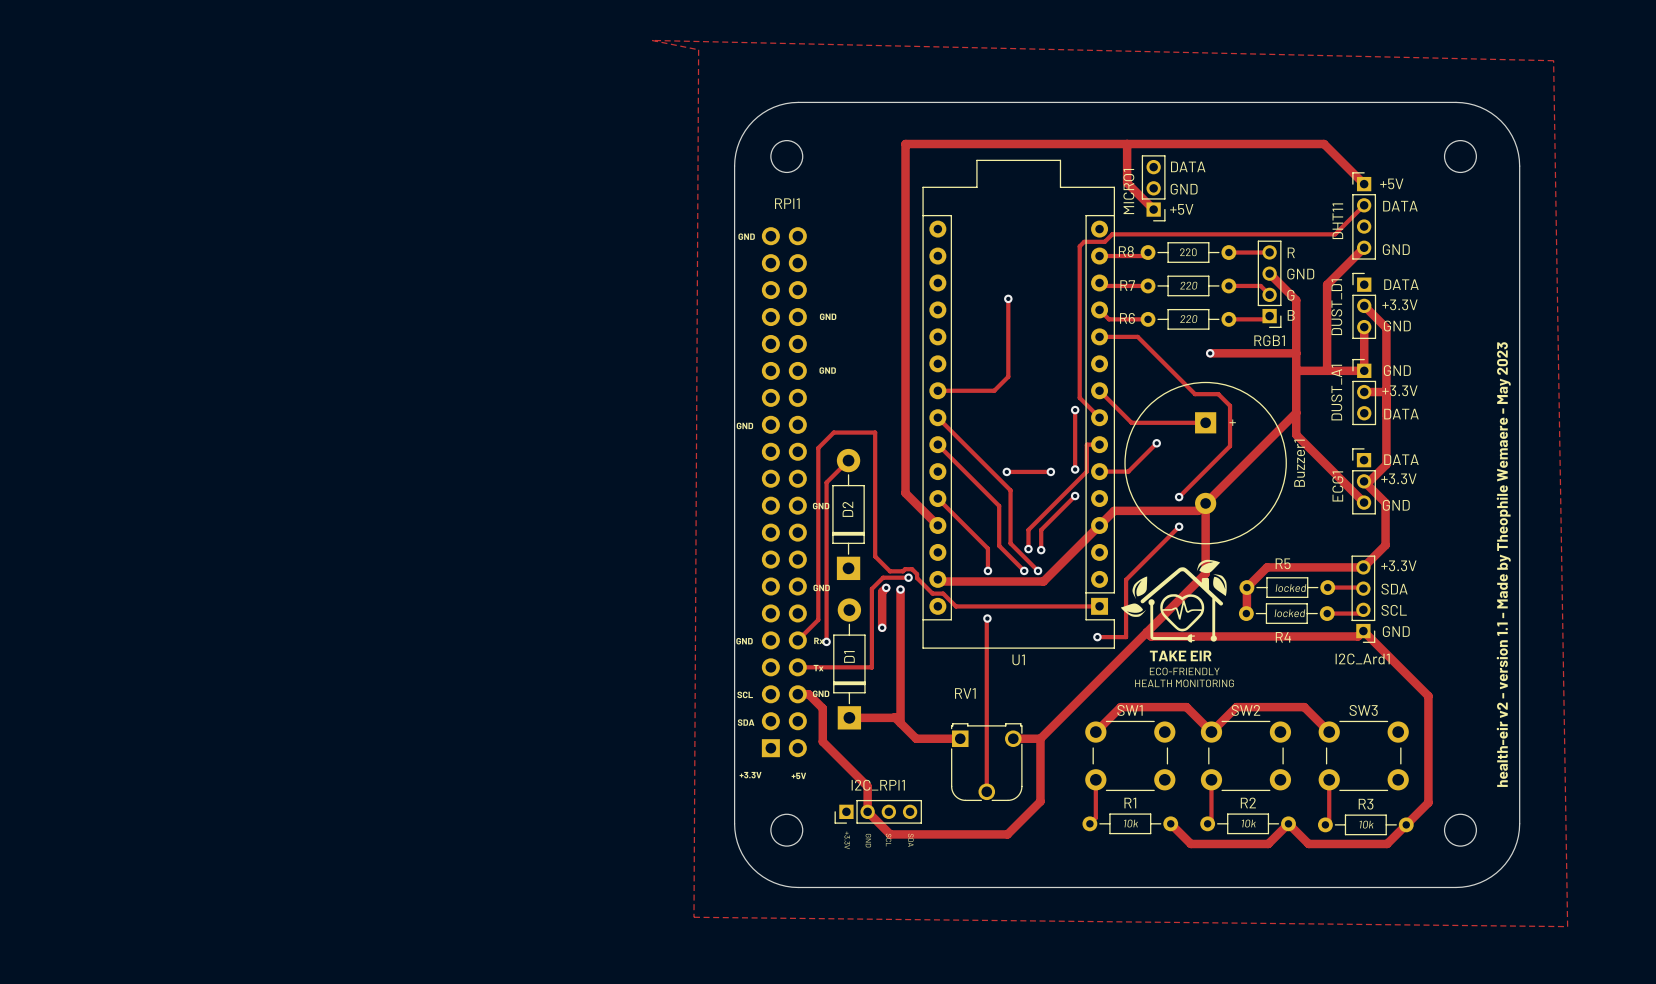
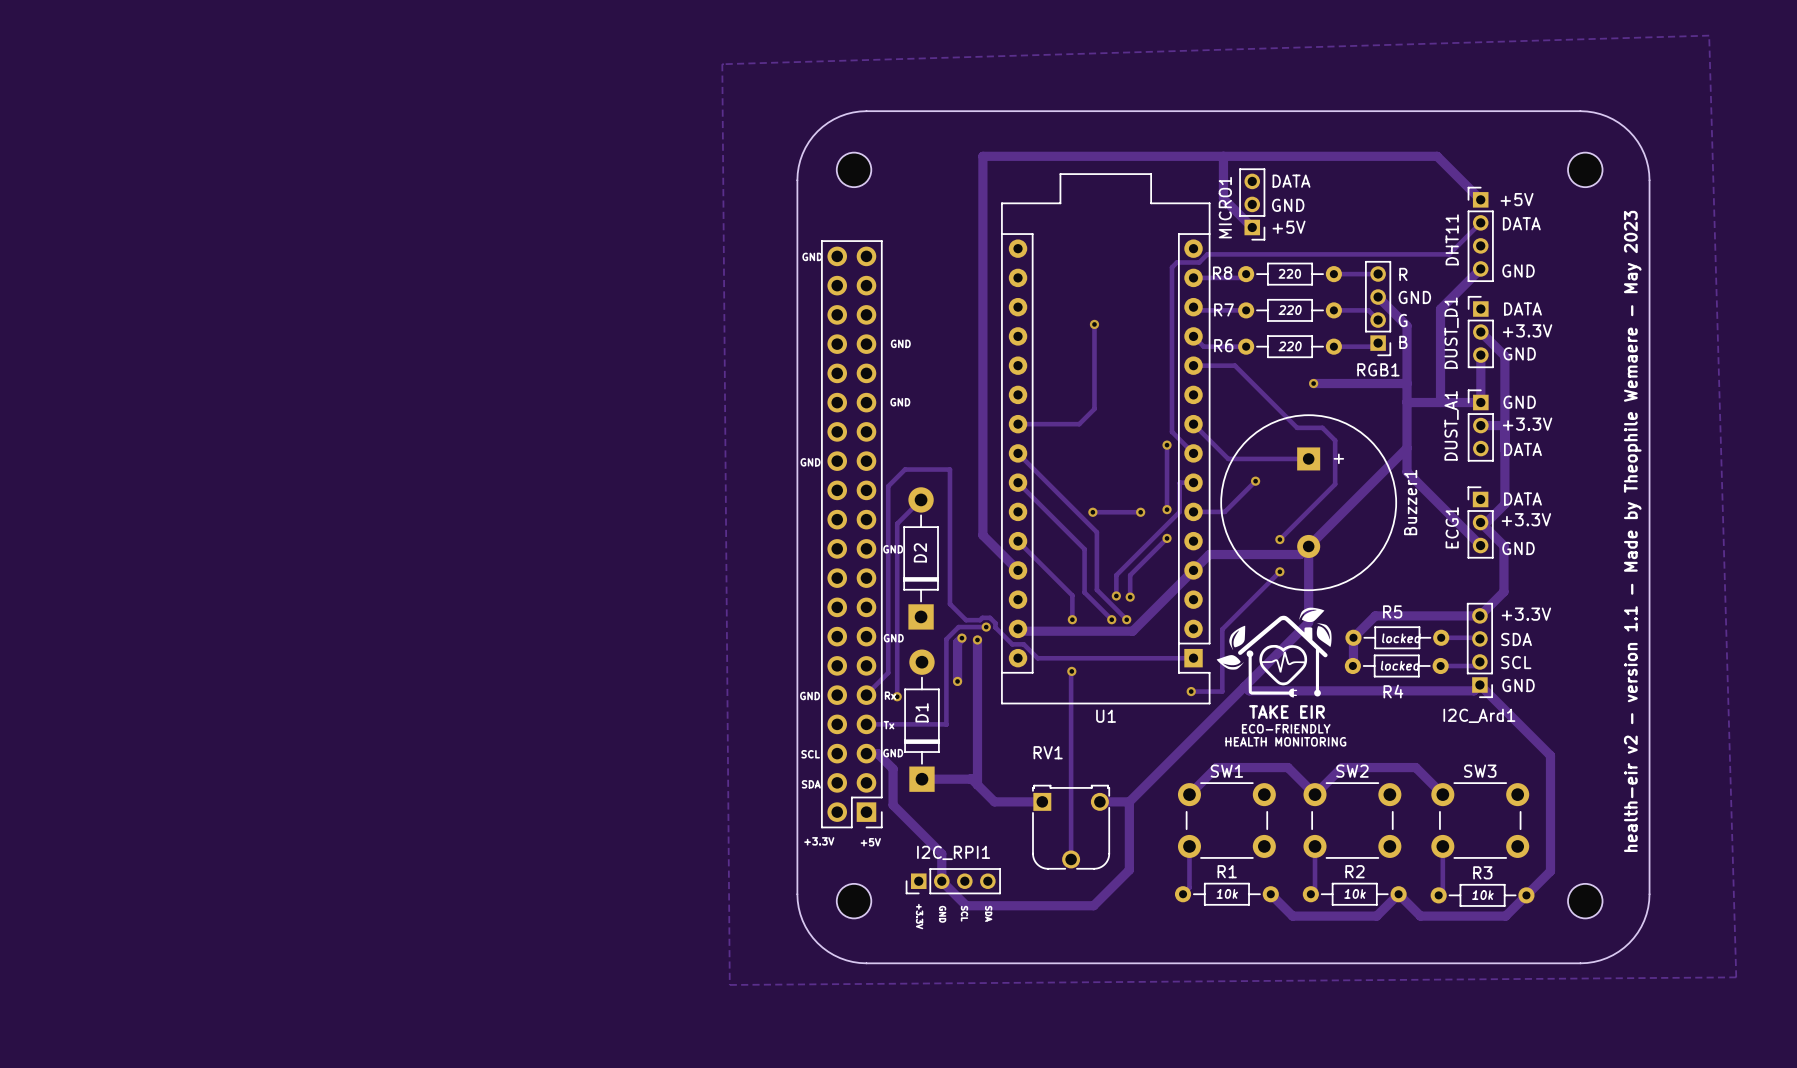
zone outline: (652, 40) (1553, 60) (1567, 926) (693, 917) (698, 49) (652, 40) -> (1709, 35) (722, 64) (729, 984) (1736, 977) (1709, 35)
RPI1 side: bottom (784, 492) -> top (851, 534)

